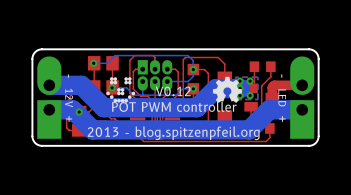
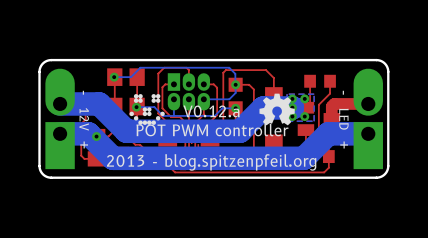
text: V0.12 (173, 91) -> V0.12.a (211, 111)

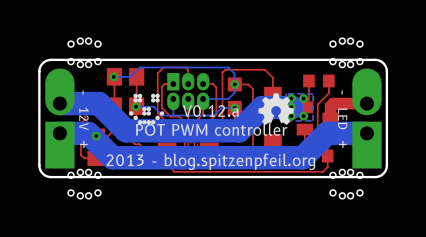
part: none -> (84, 52)
part: none -> (346, 52)
part: none -> (84, 184)
part: none -> (346, 184)

